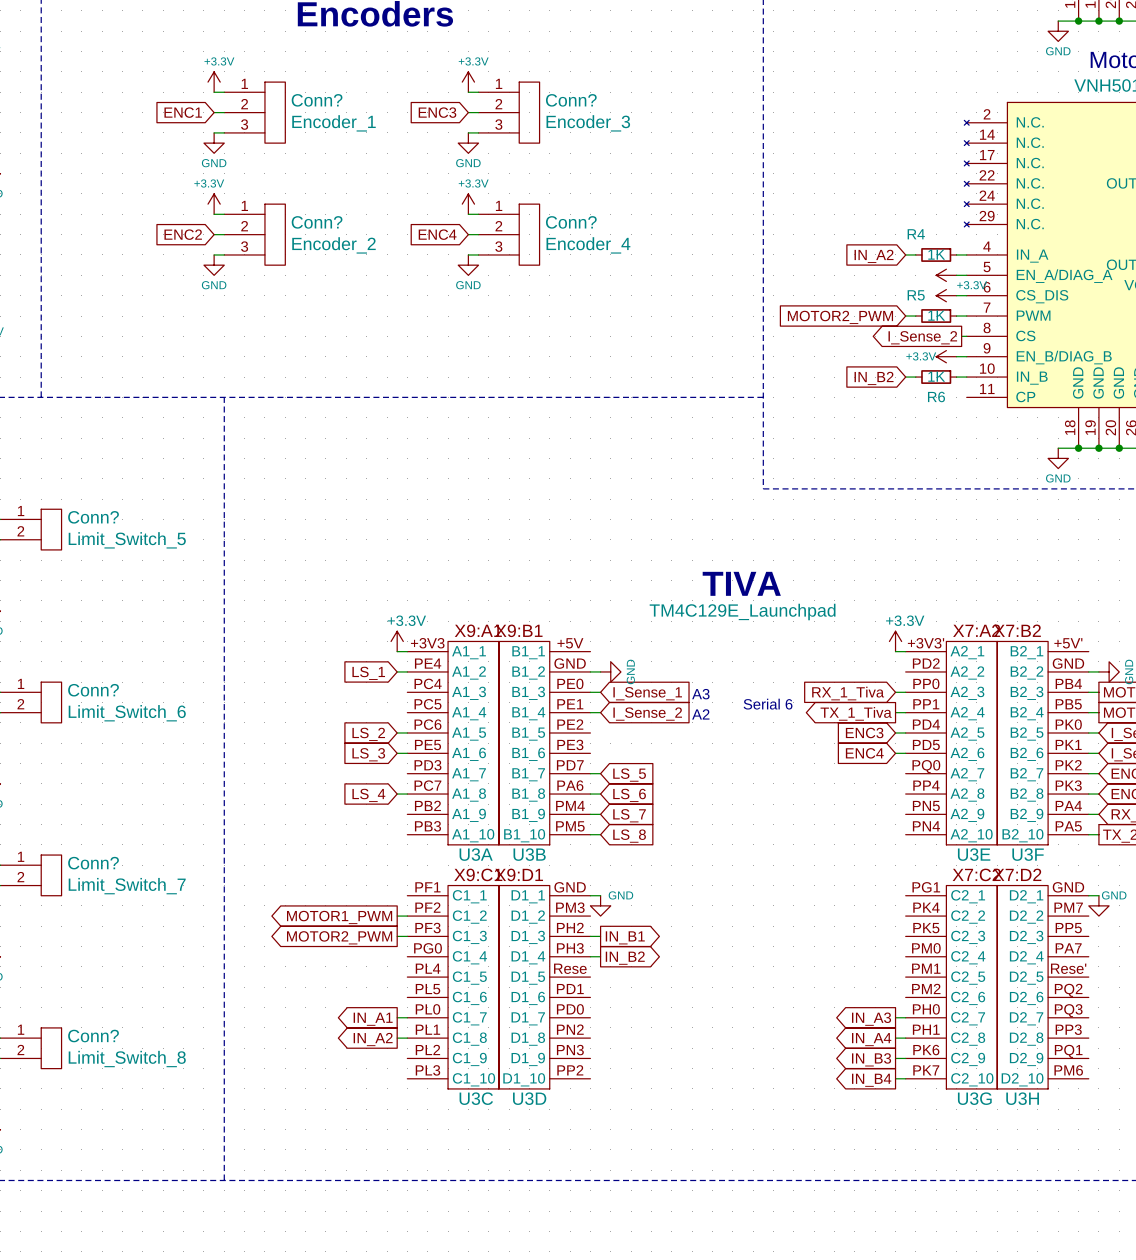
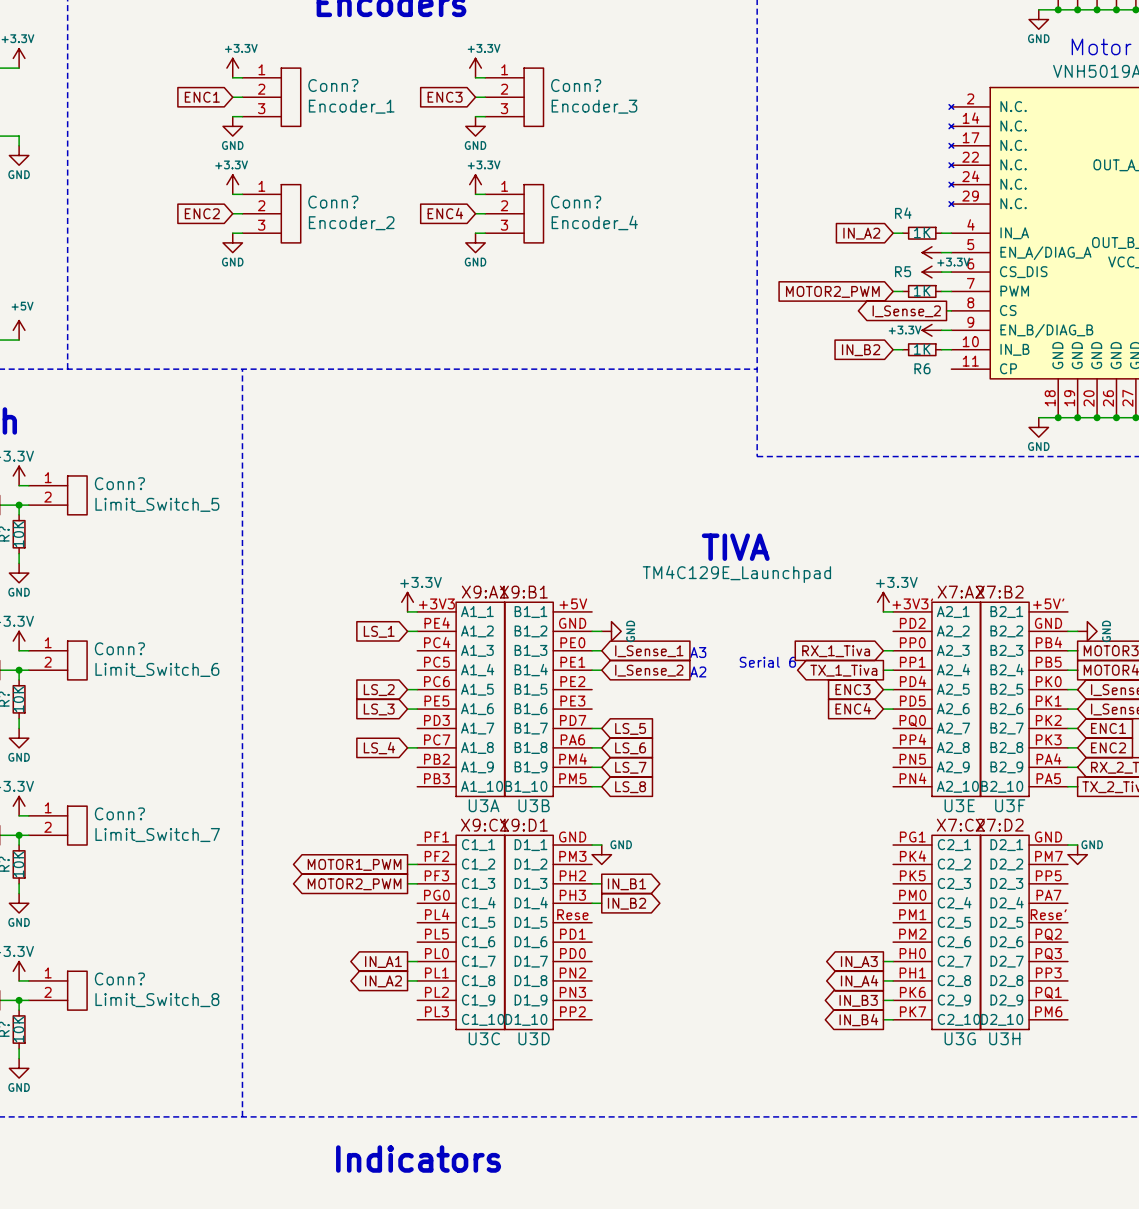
text: none -> Indicators (418, 1159)

